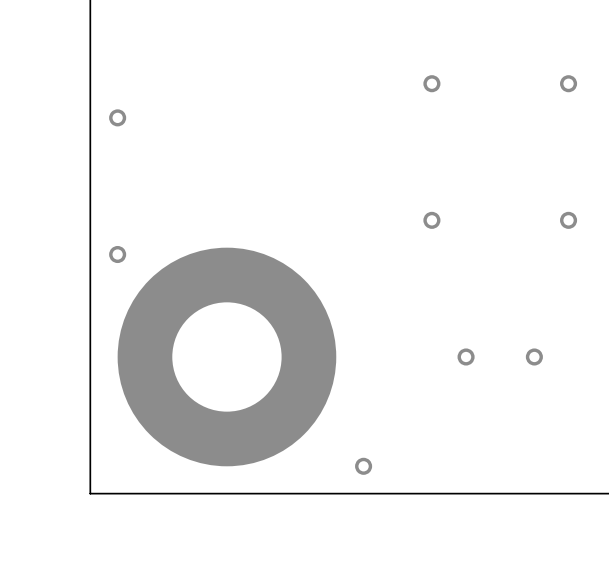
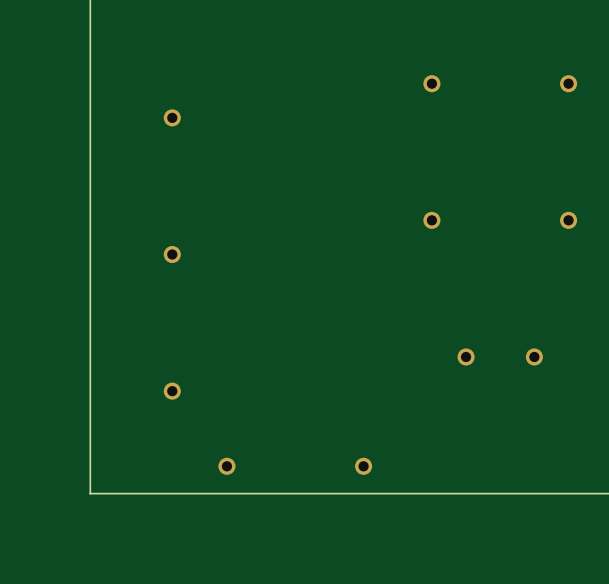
via position: (117, 117) -> (172, 117)
via position: (117, 254) -> (172, 254)
part: (226, 356) -> none
via: none -> (172, 391)
via: none -> (226, 466)

